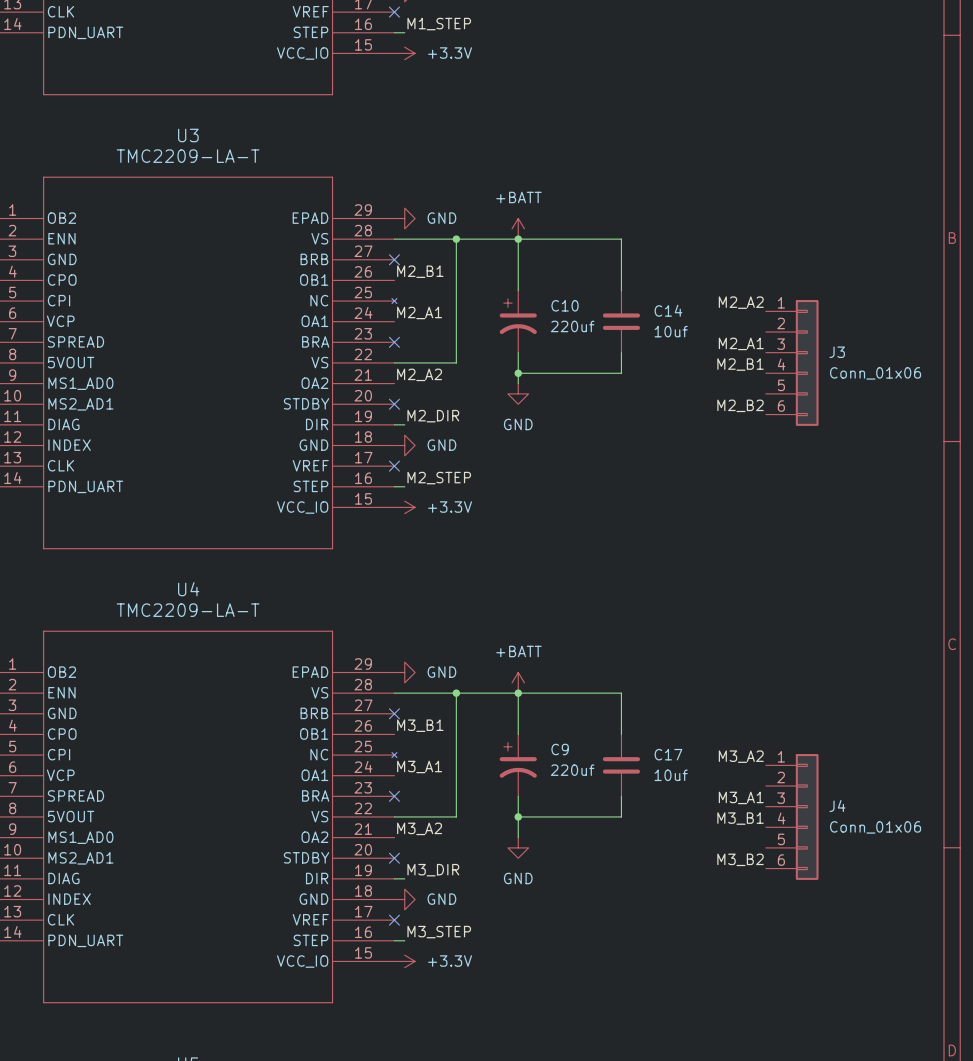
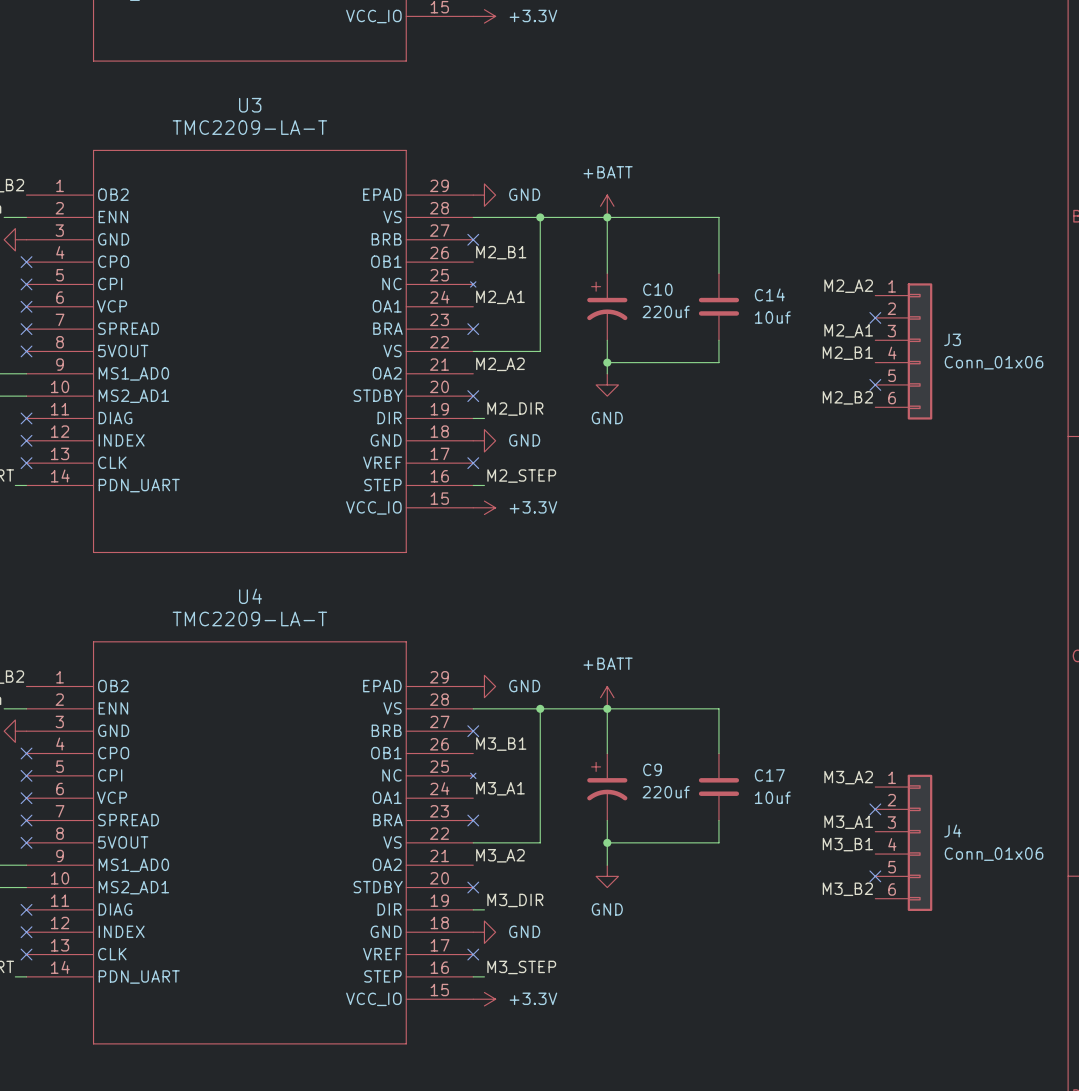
no-connect mark: none -> (875, 317)
no-connect mark: none -> (875, 384)
no-connect mark: none -> (875, 809)
no-connect mark: none -> (875, 876)

